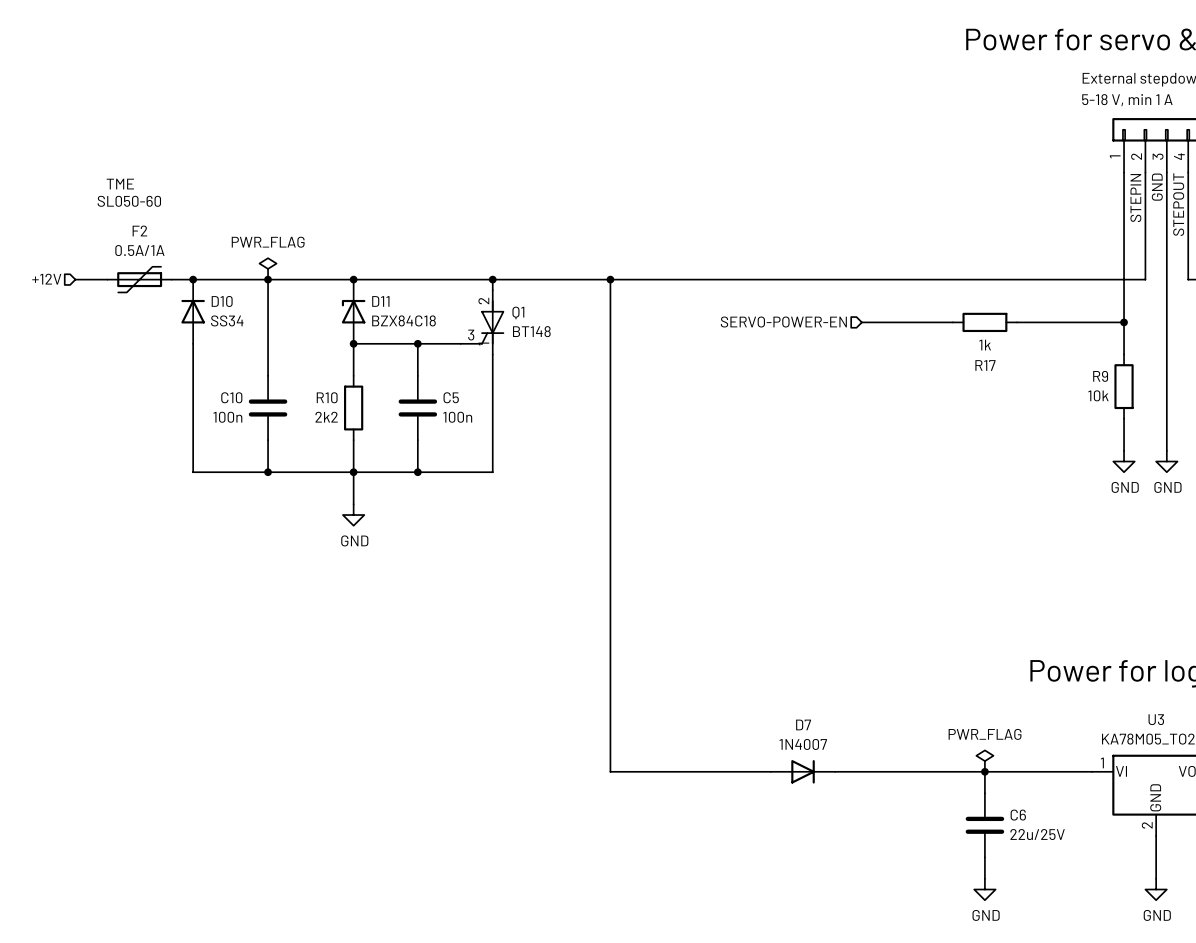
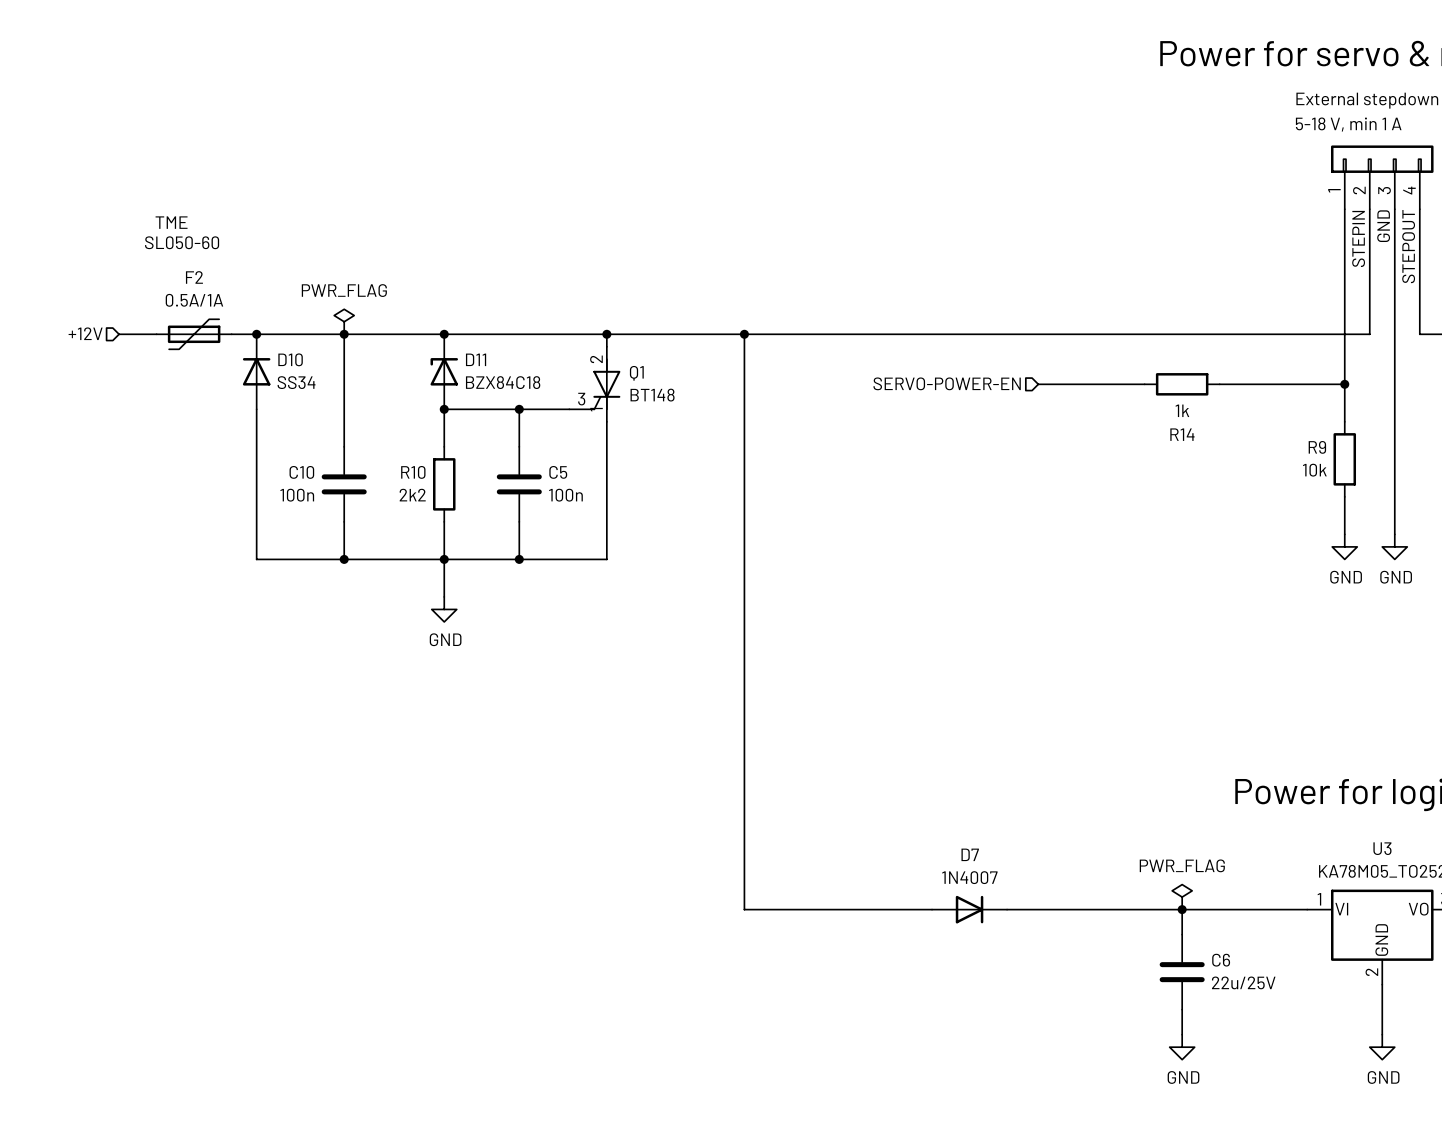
R17 name: R17 (985, 365) -> R14 (1182, 434)

